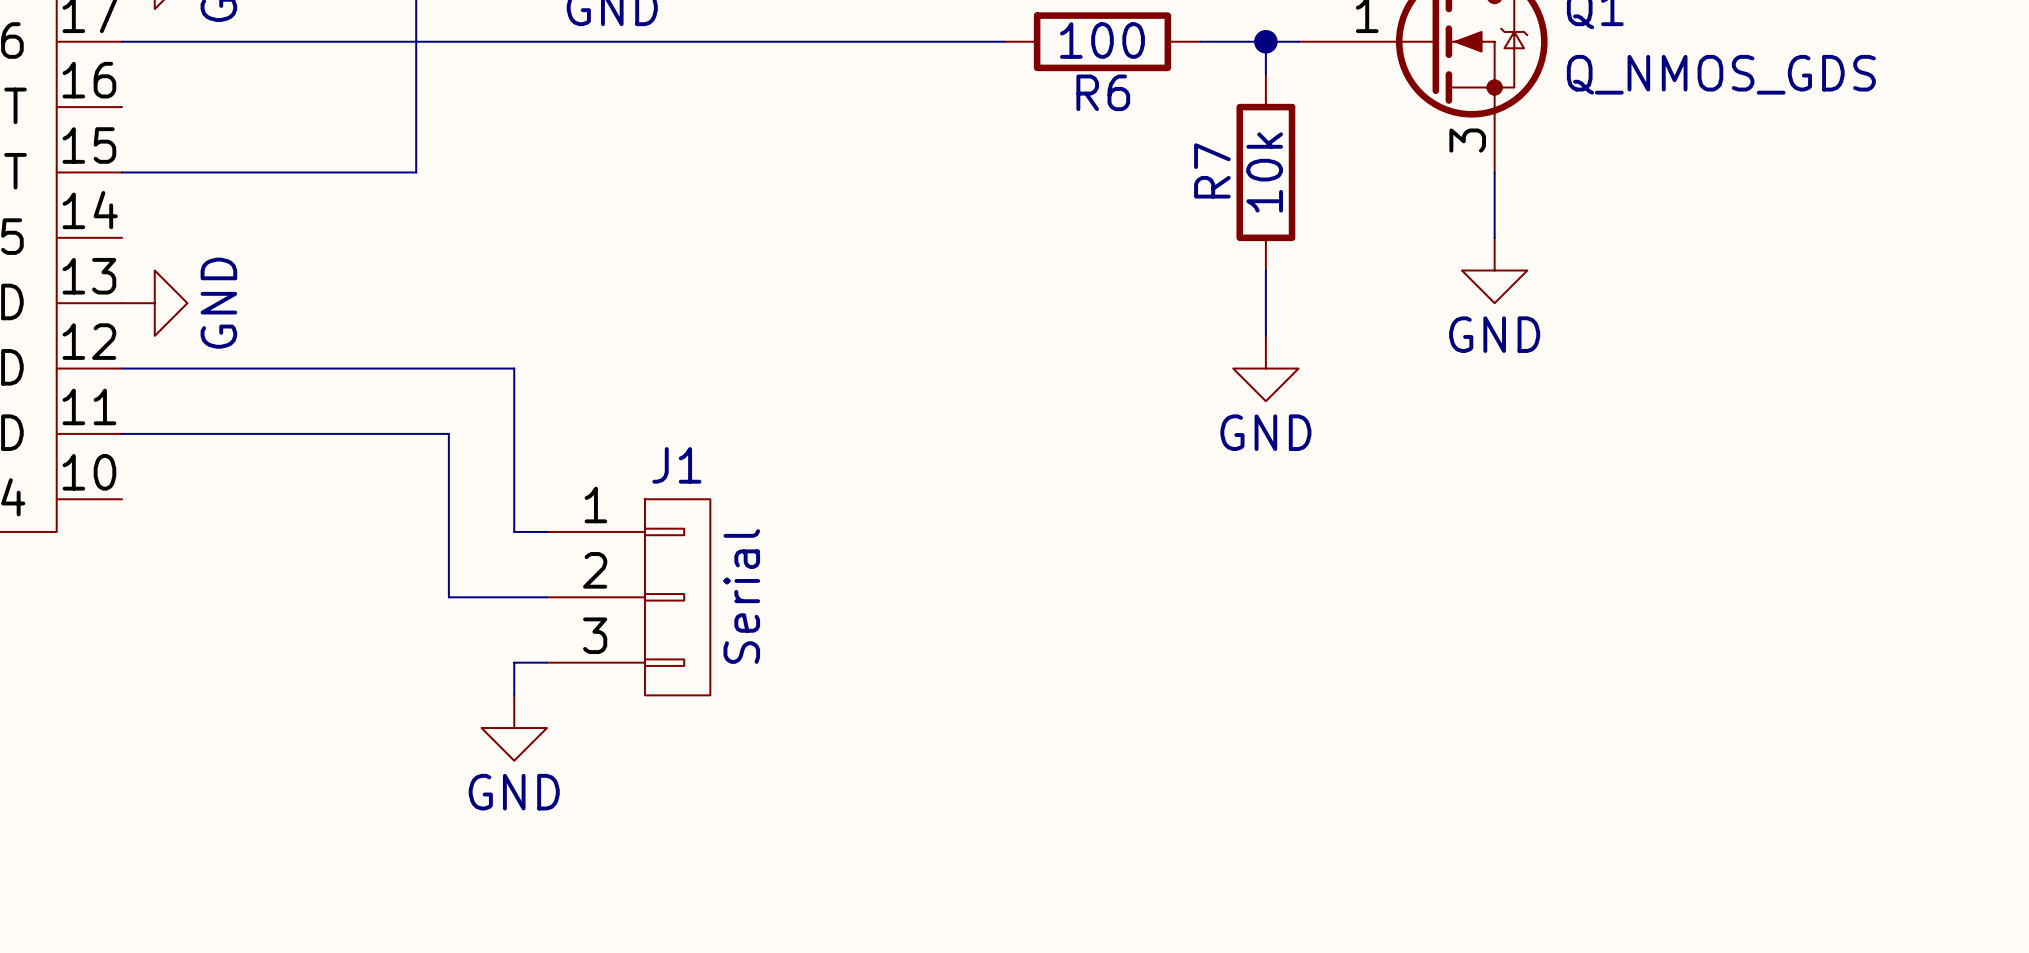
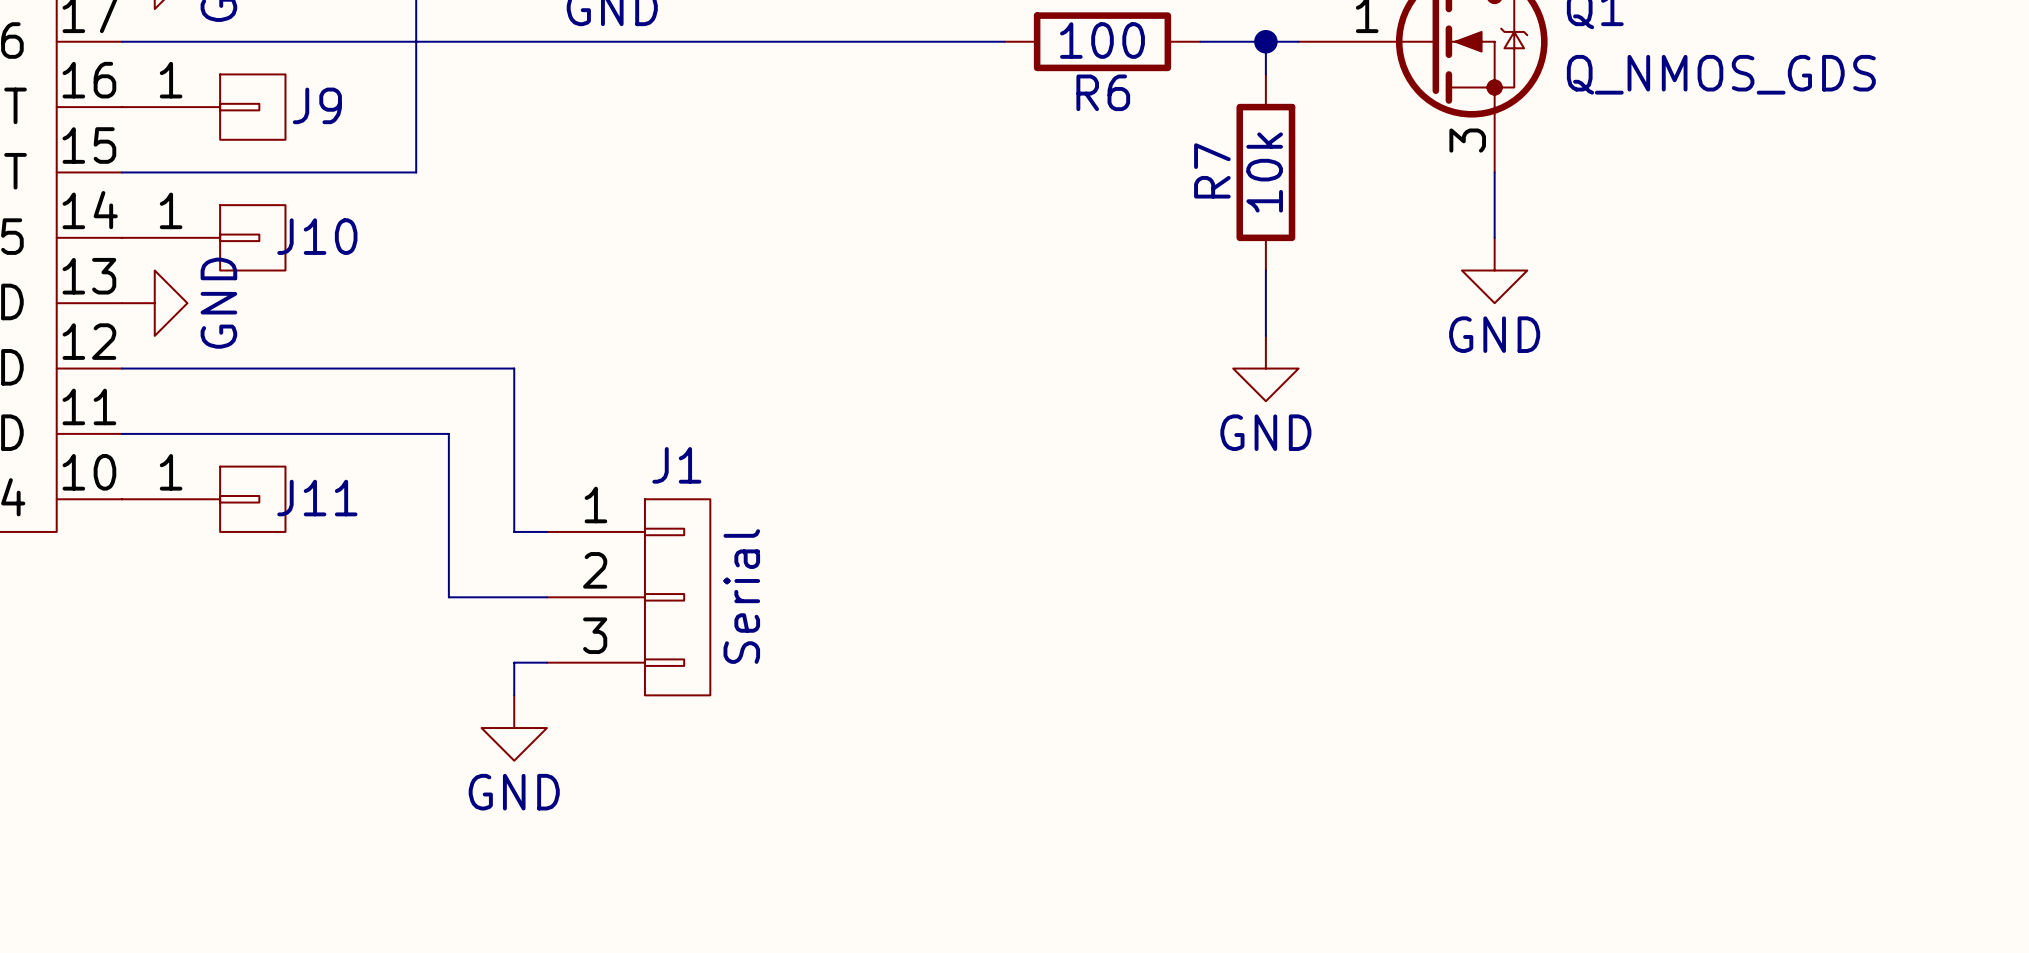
J9: none -> (203, 107)
J10: none -> (203, 237)
J11: none -> (203, 499)

